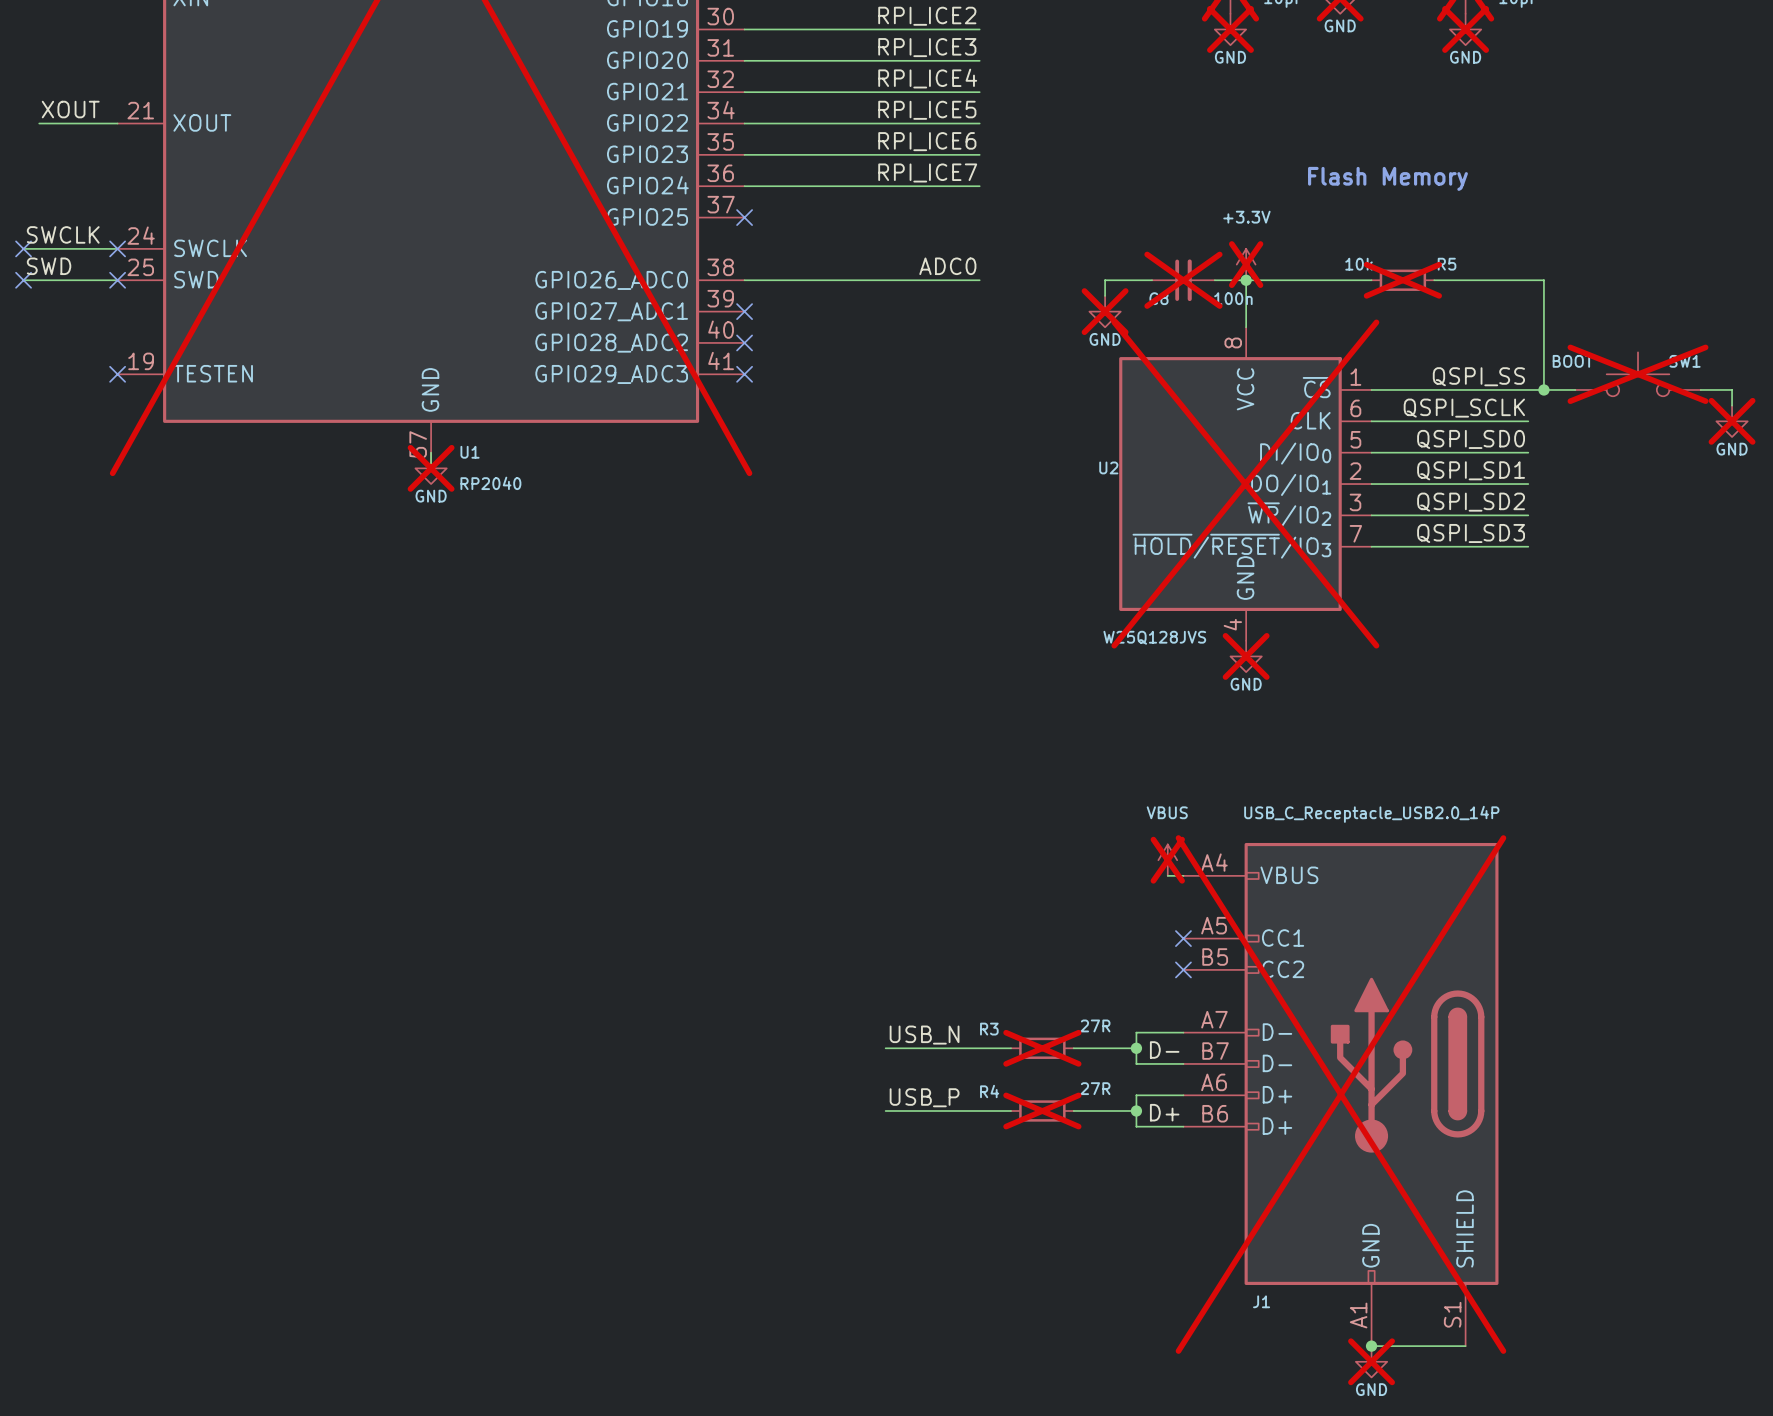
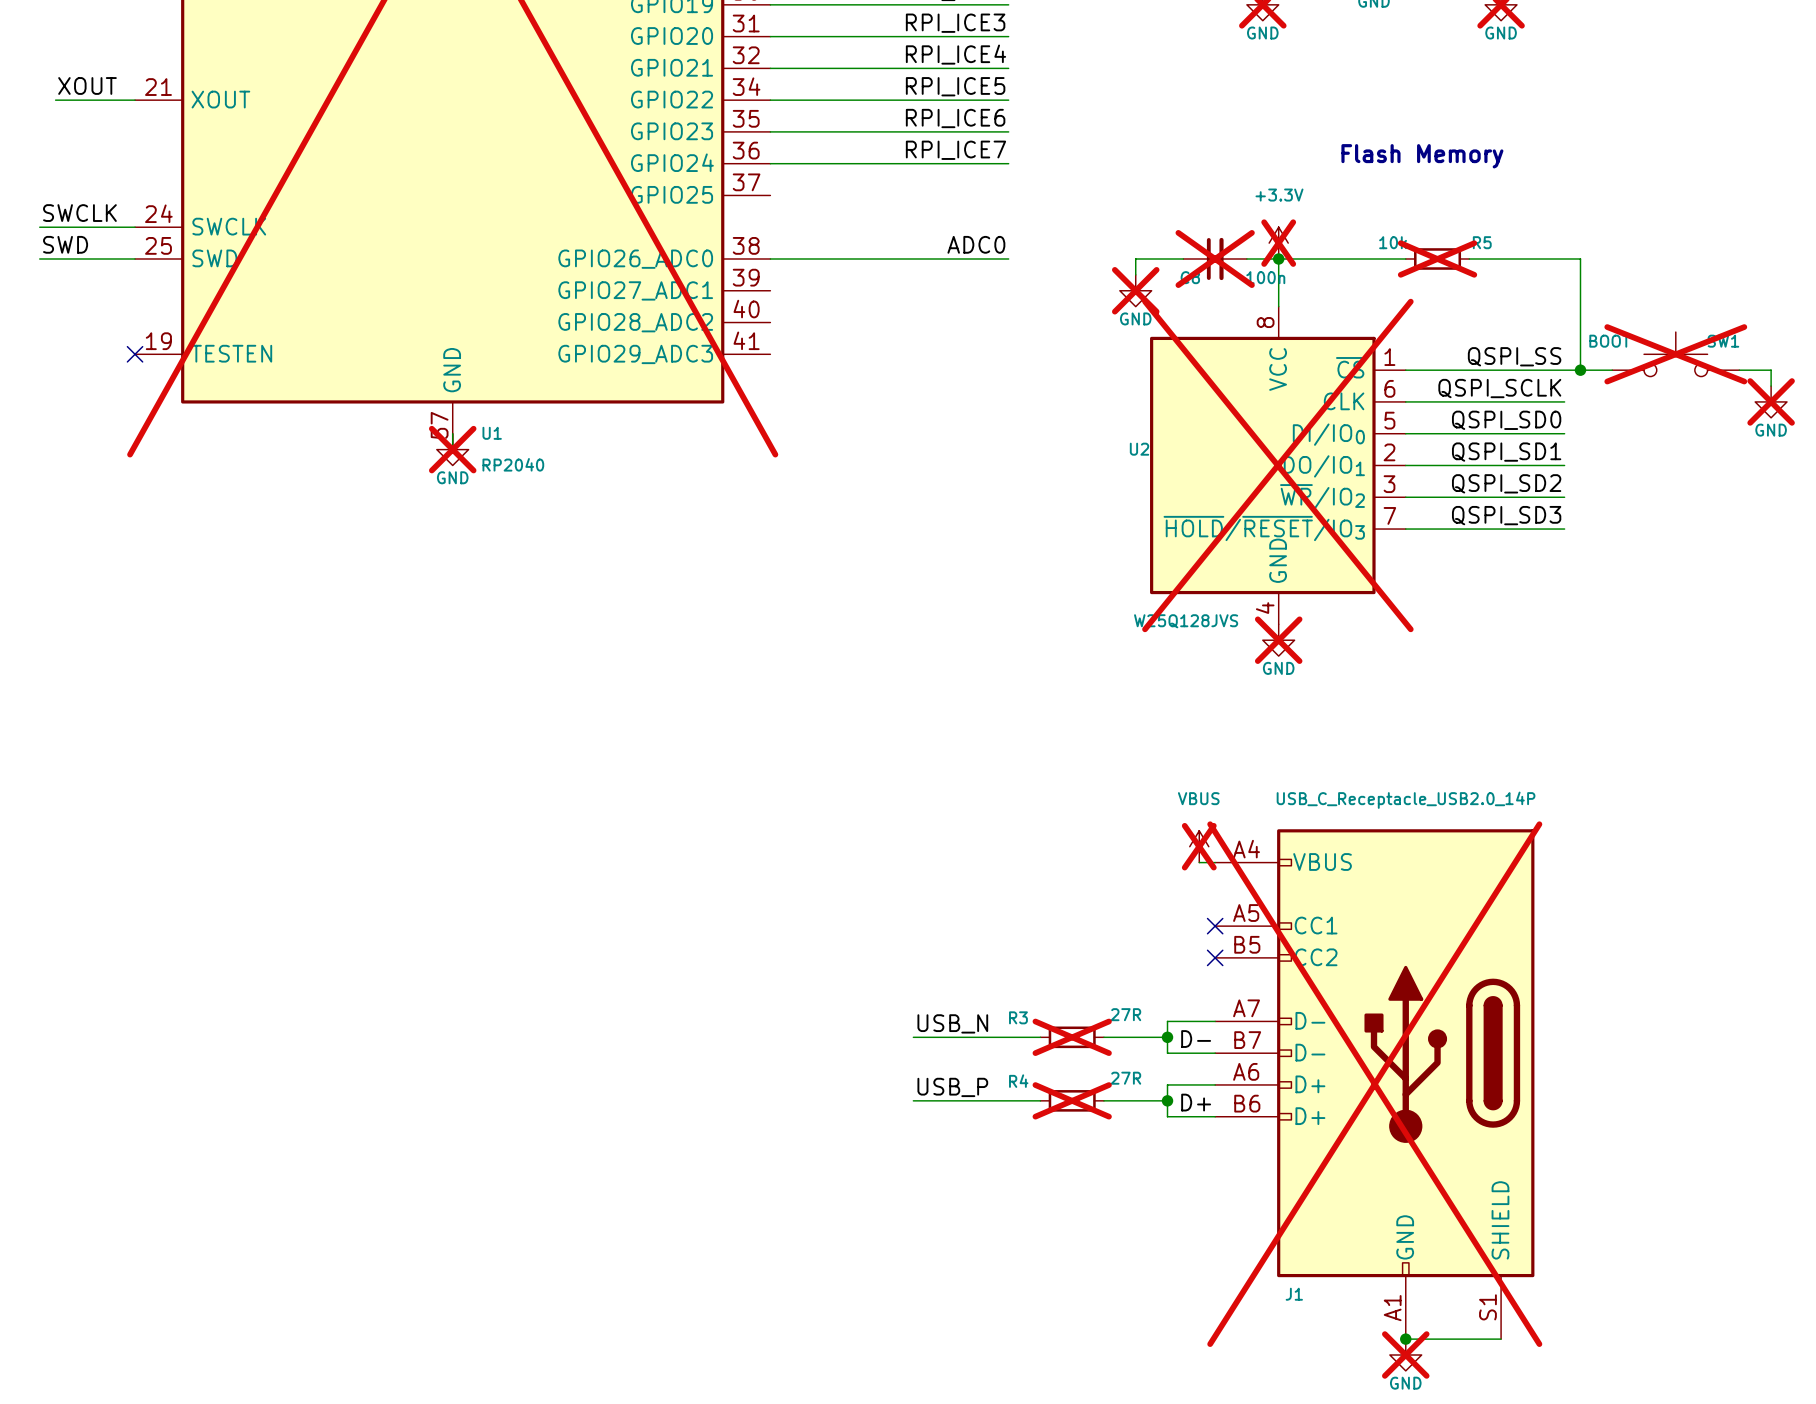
no-connect mark: (744, 217) -> none
no-connect mark: (23, 248) -> none
no-connect mark: (117, 248) -> none
no-connect mark: (23, 280) -> none
no-connect mark: (117, 280) -> none
no-connect mark: (744, 311) -> none
no-connect mark: (744, 342) -> none
no-connect mark: (744, 374) -> none

